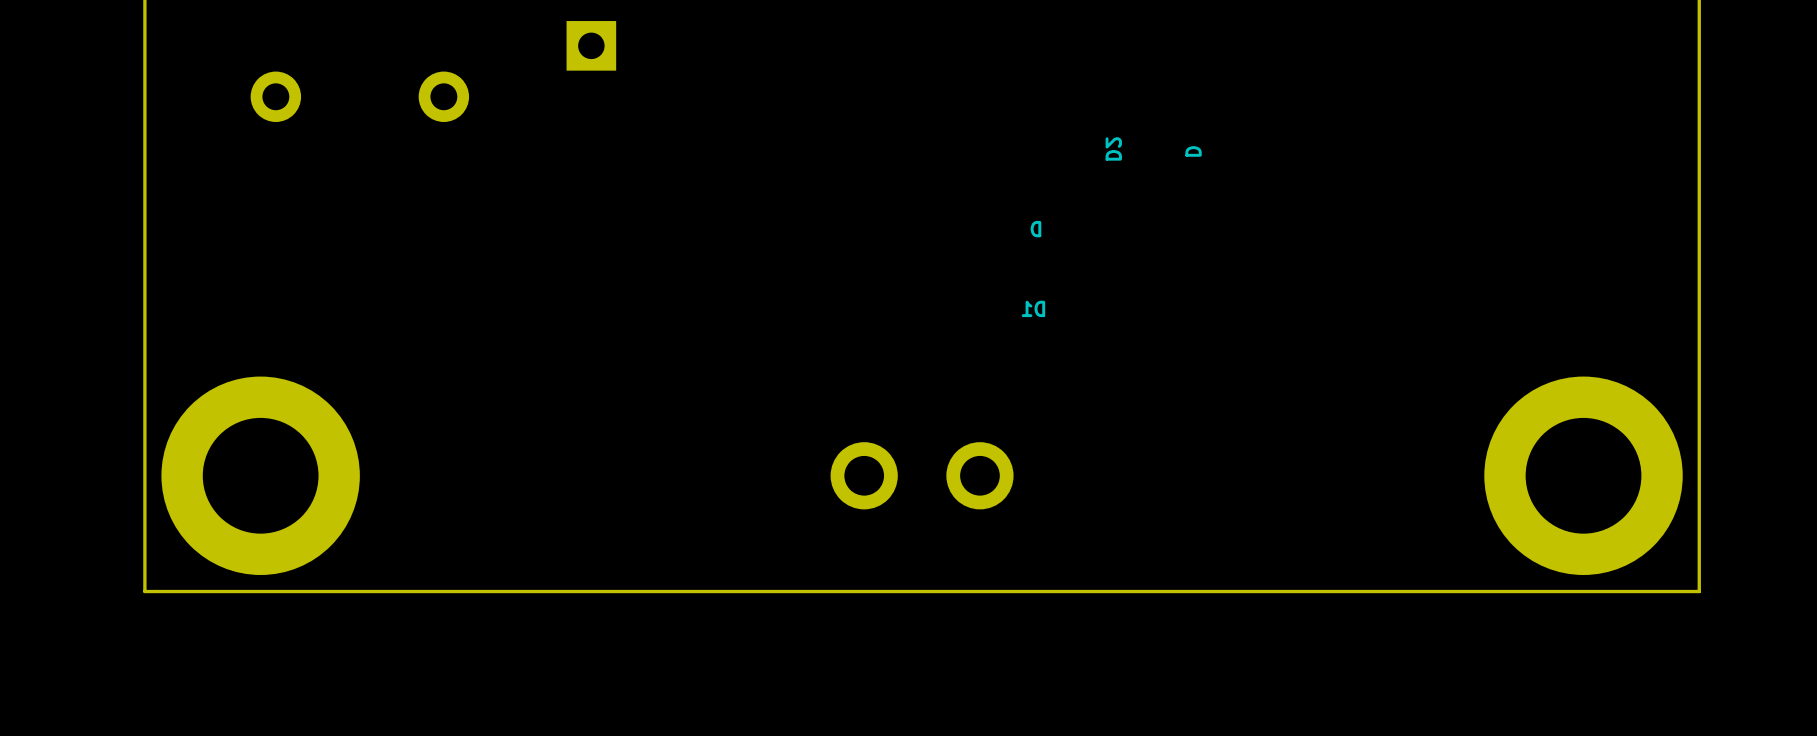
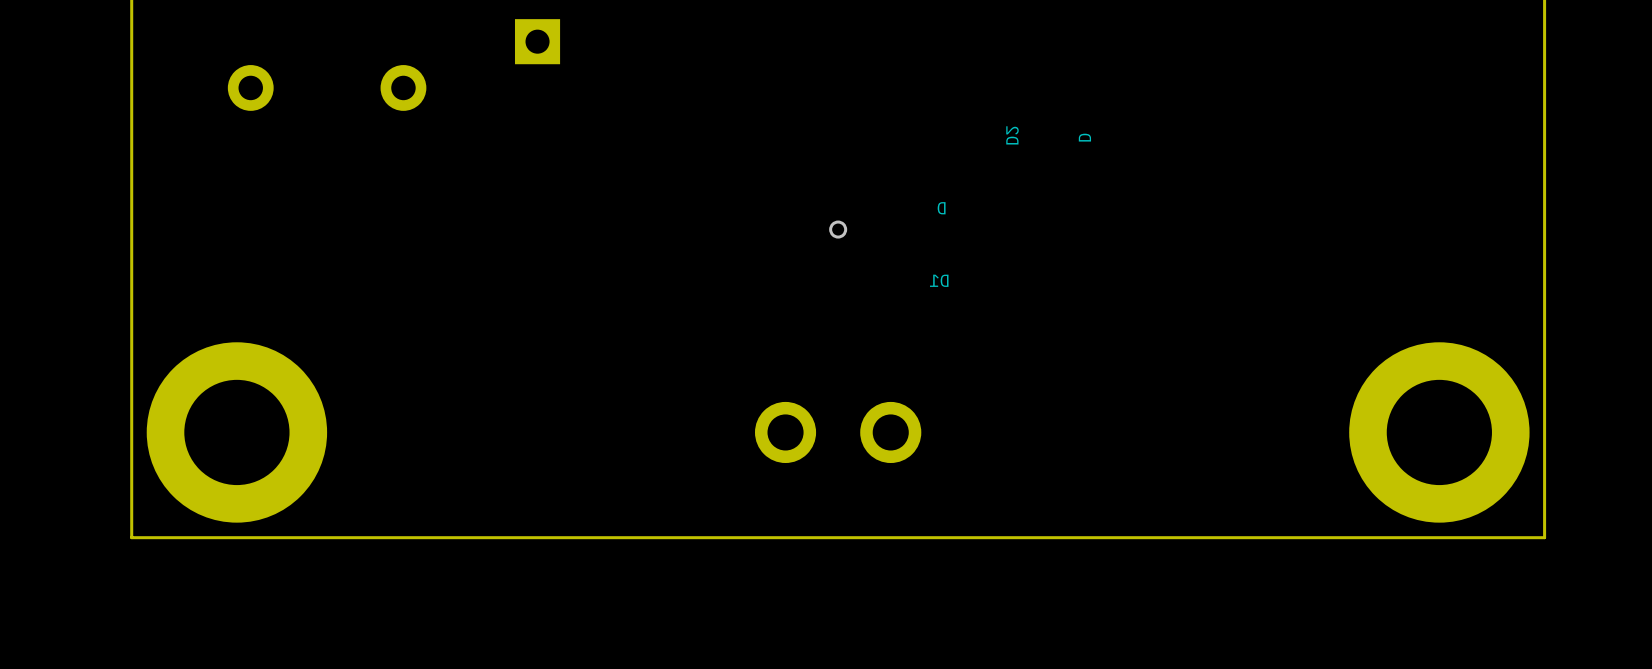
via: none -> (838, 229)

